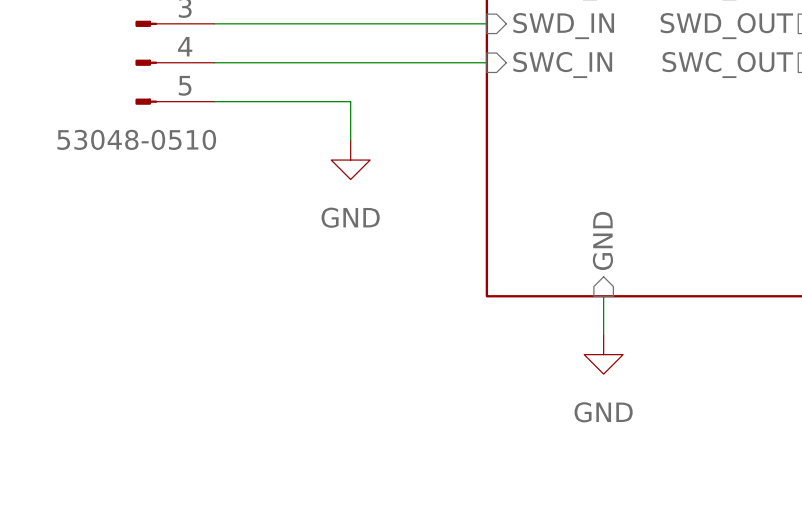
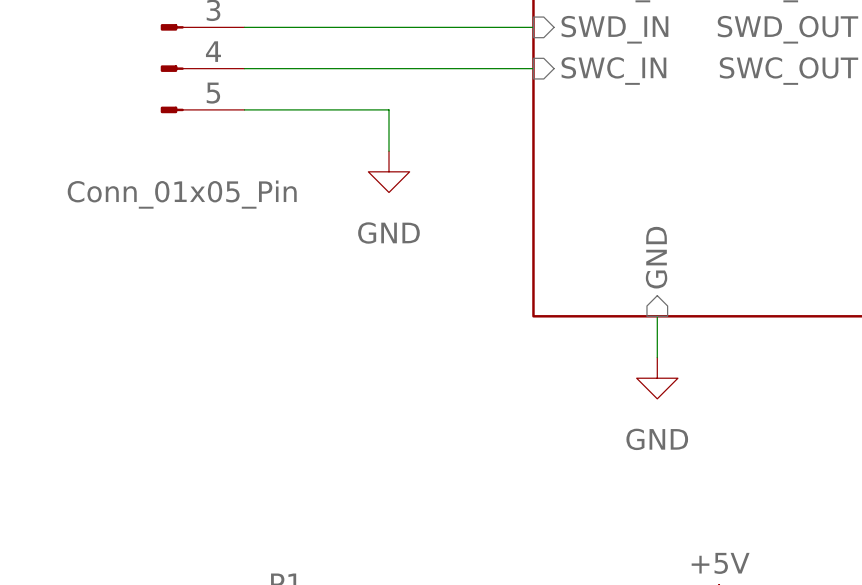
part value: 53048-0510 (136, 139) -> Conn_01x05_Pin (182, 194)

